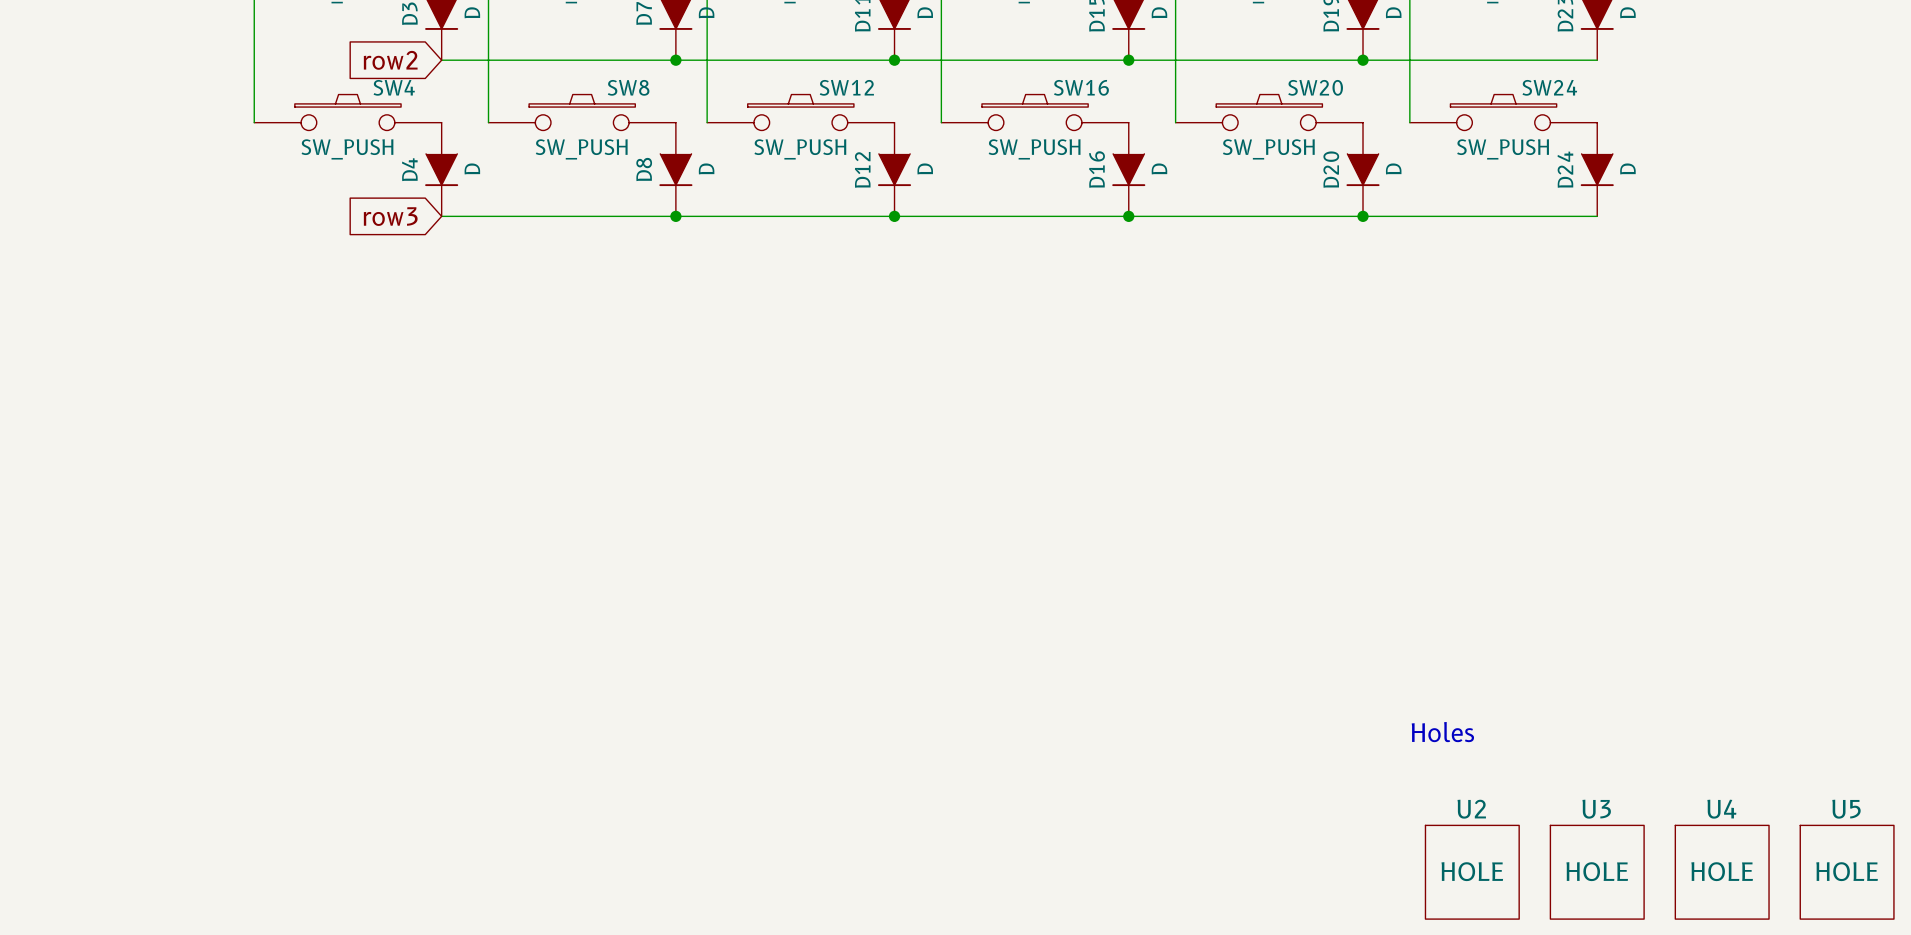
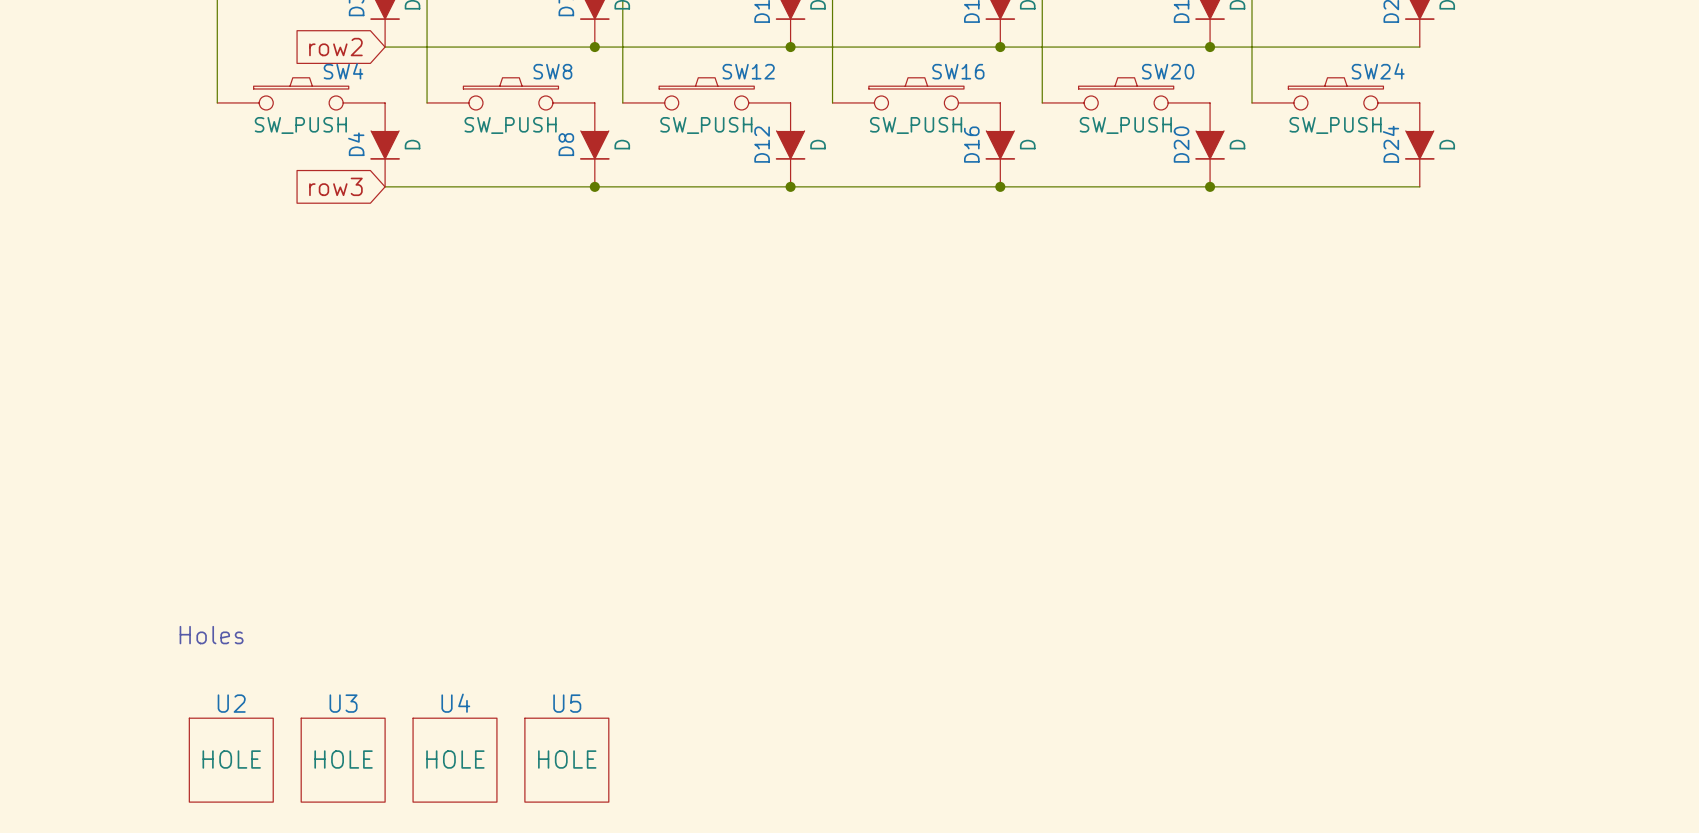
text: none -> Holes (211, 635)
text: Holes (1442, 732) -> none
U2 position: (1472, 872) -> (231, 760)
U3 position: (1597, 872) -> (343, 760)
U4 position: (1722, 872) -> (455, 760)
U5 position: (1847, 872) -> (566, 760)

